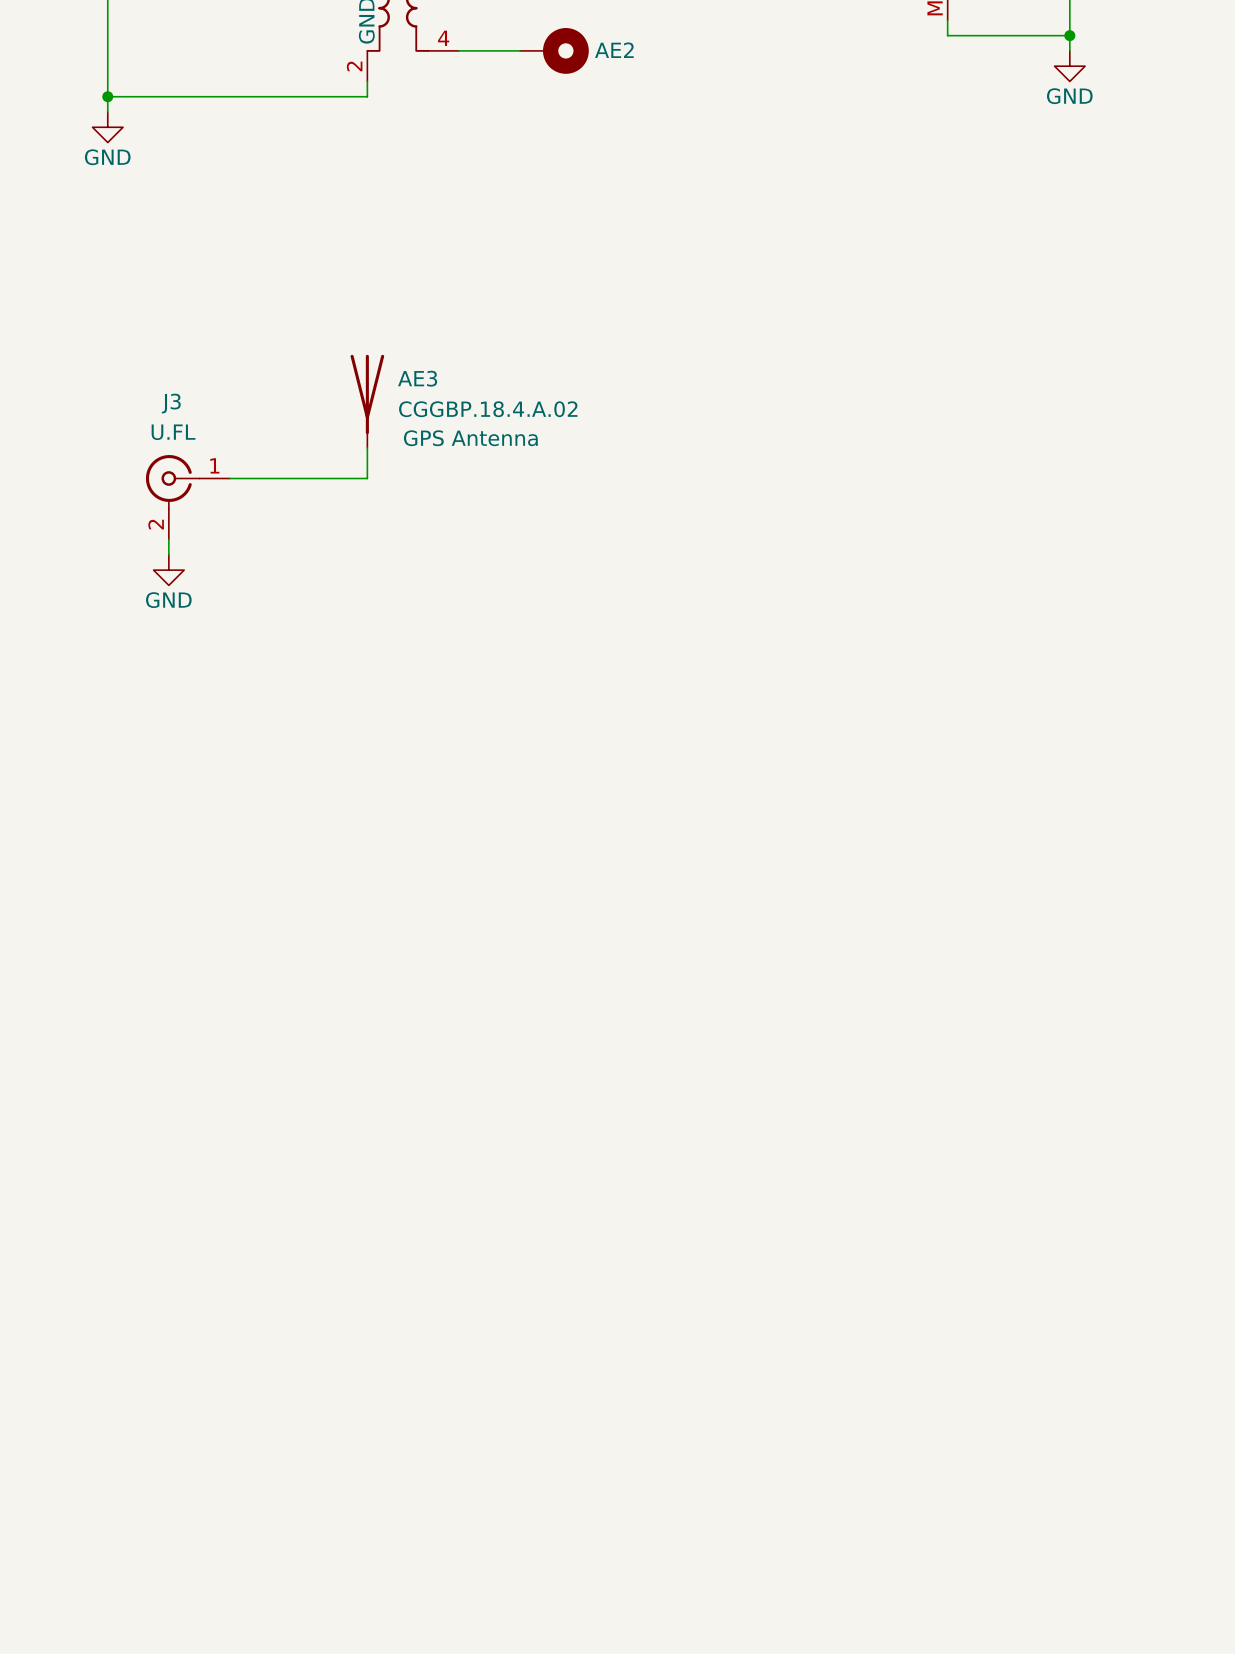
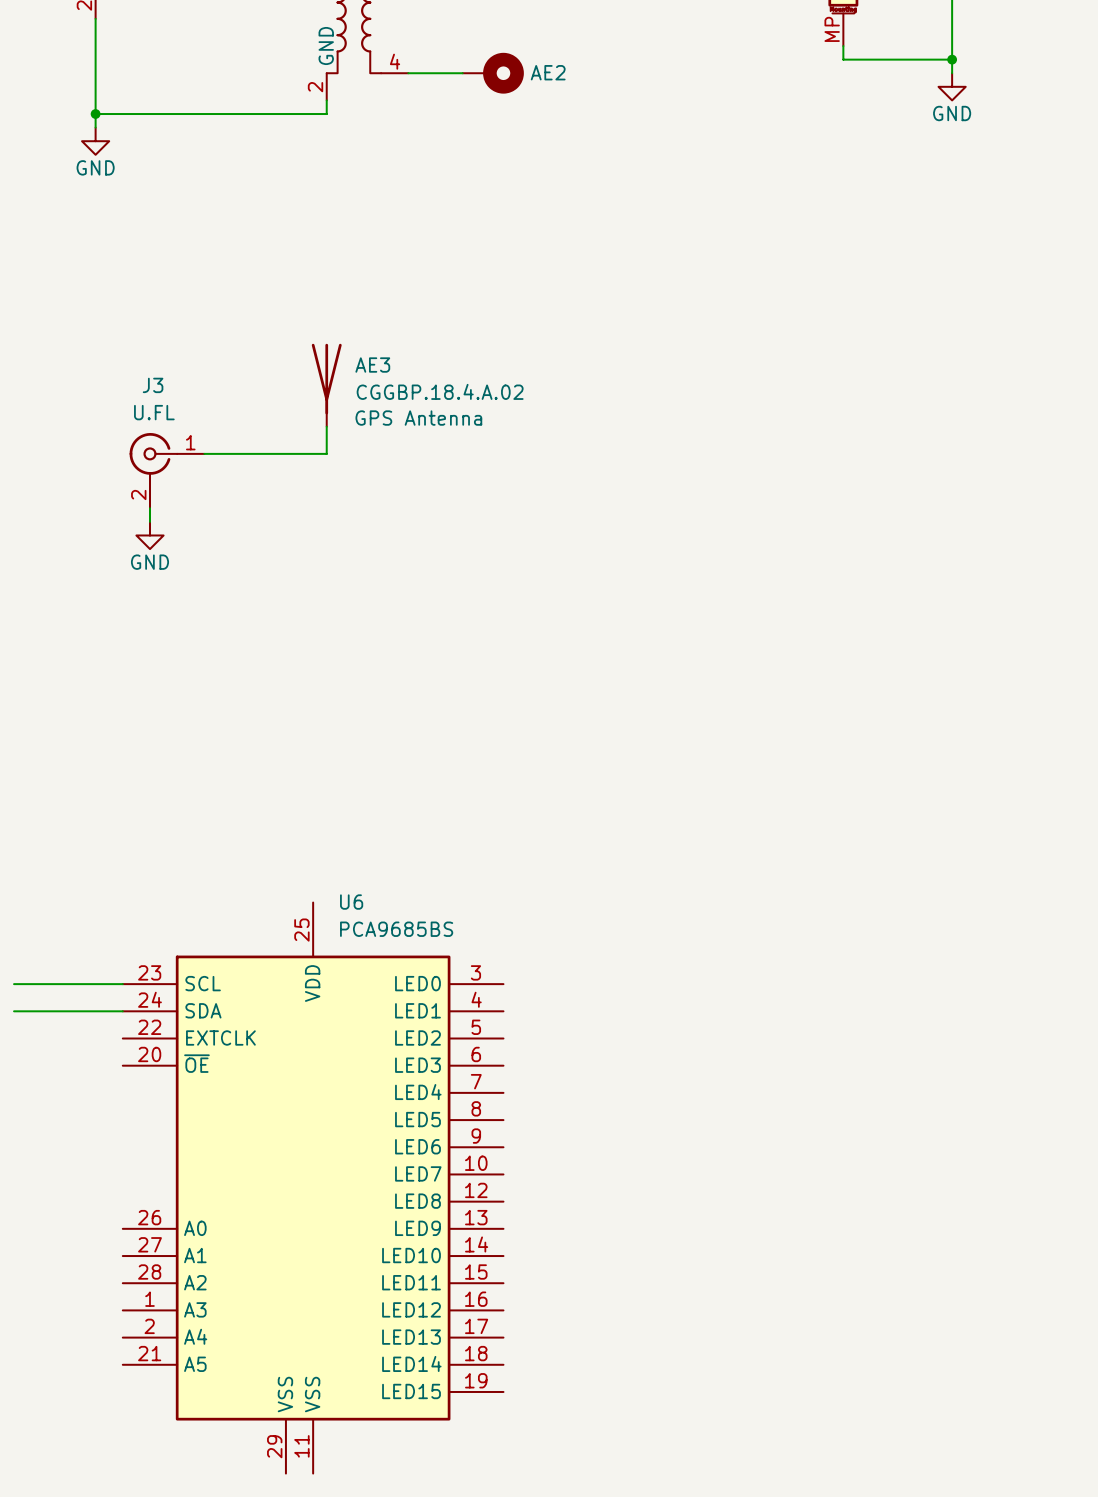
wire: none -> (14, 984) (122, 984)
wire: none -> (14, 1011) (122, 1011)
U6: none -> PCA9685BS (313, 1188)

